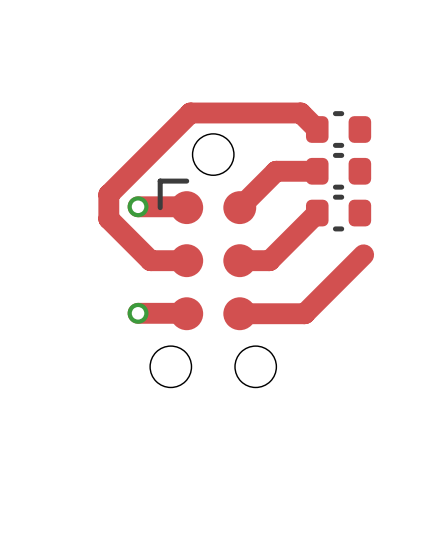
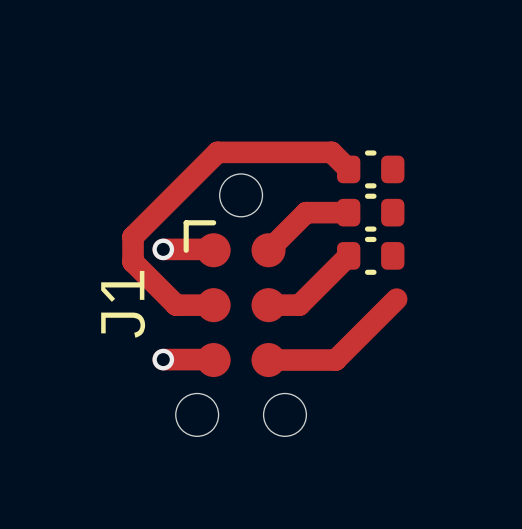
J1 name: none -> J1 (123, 304)

